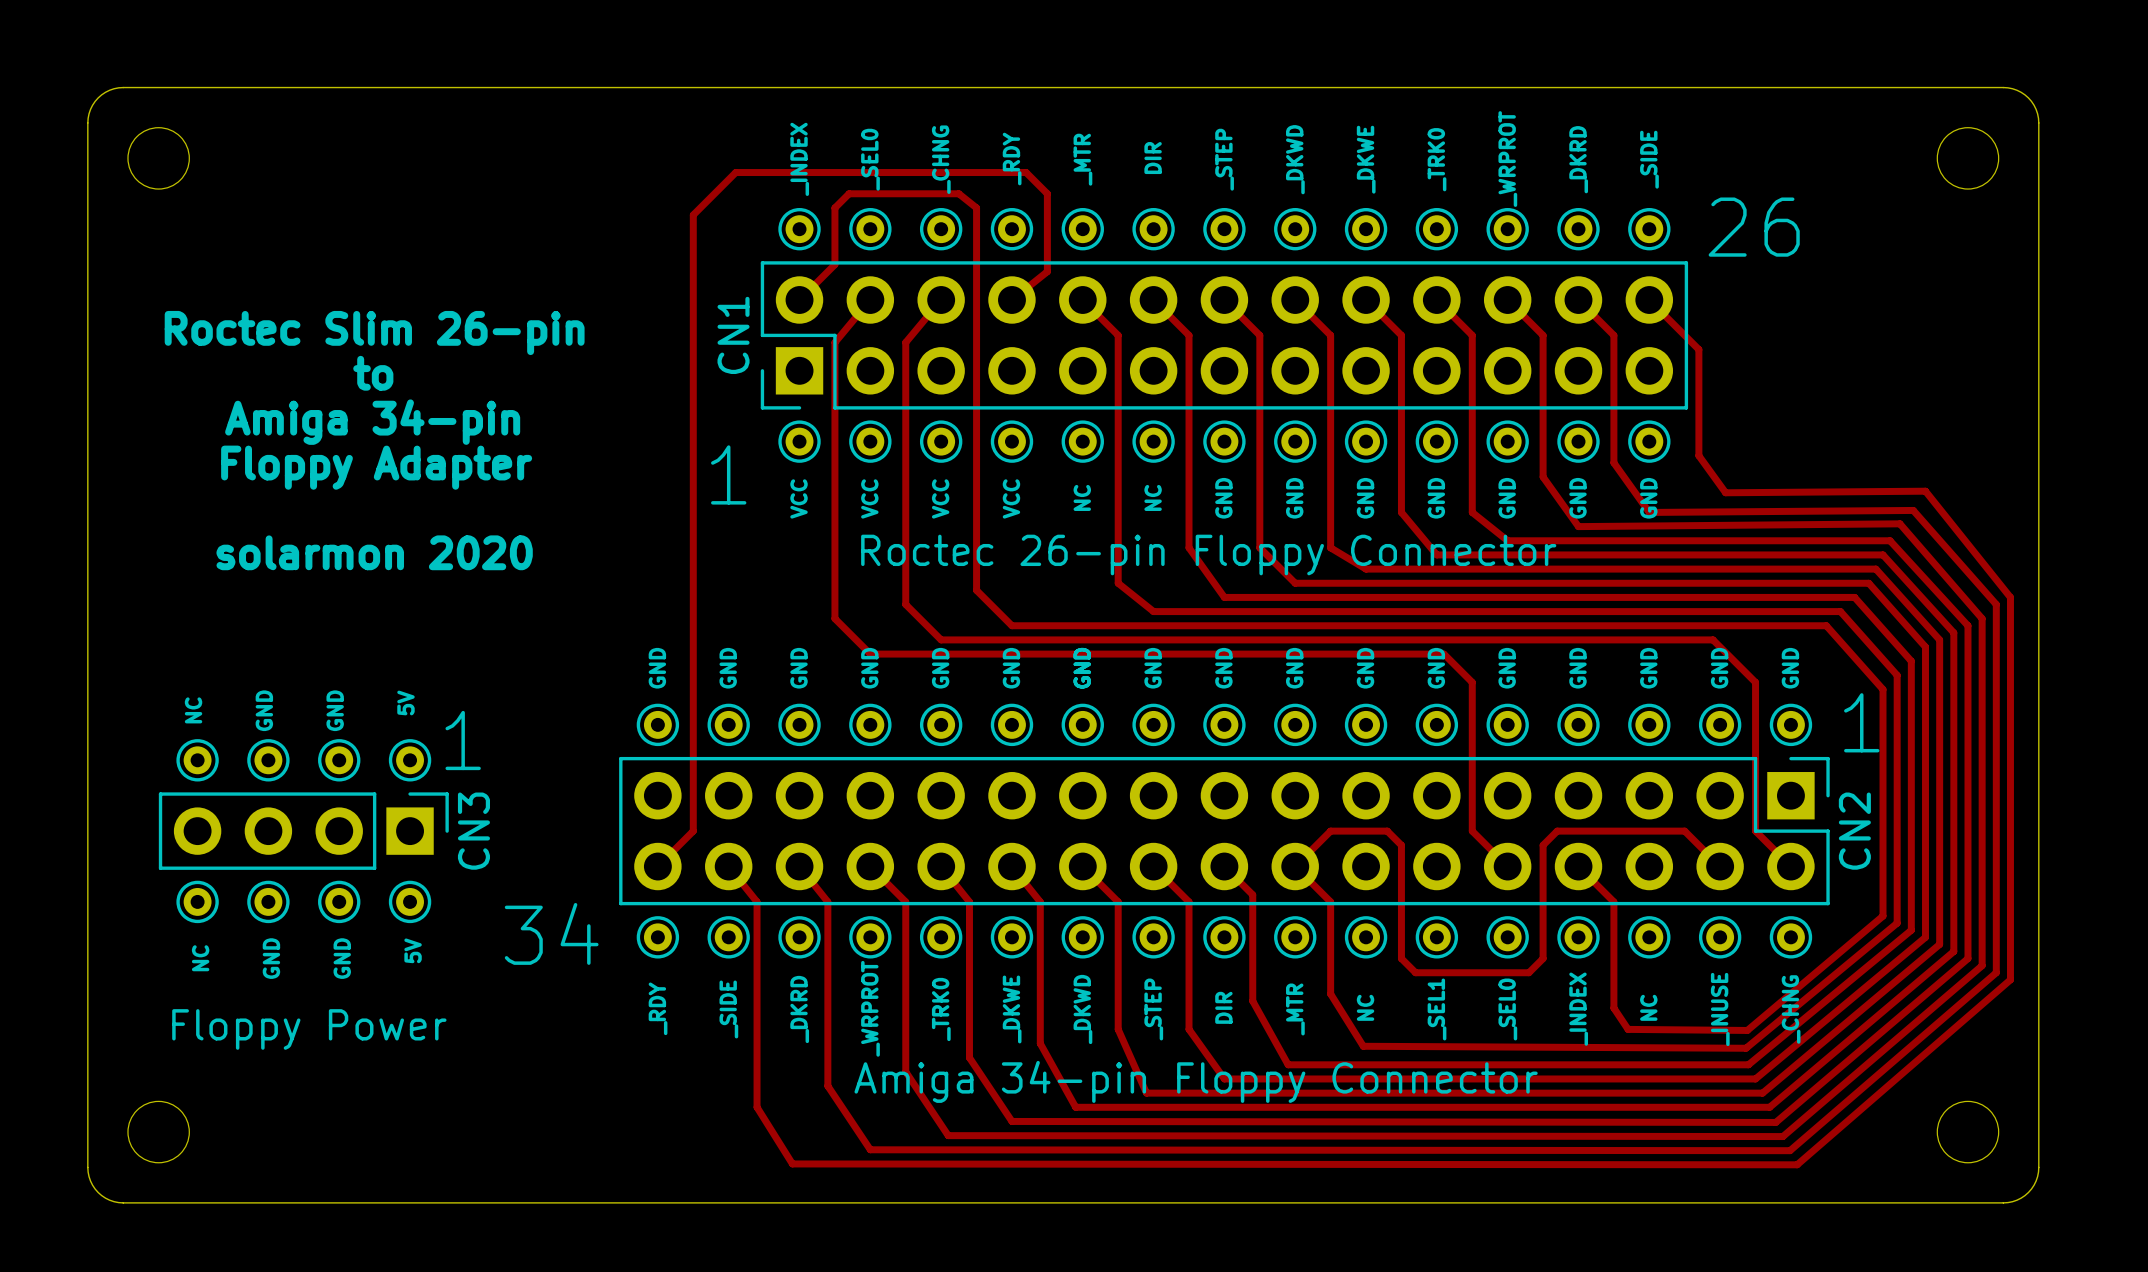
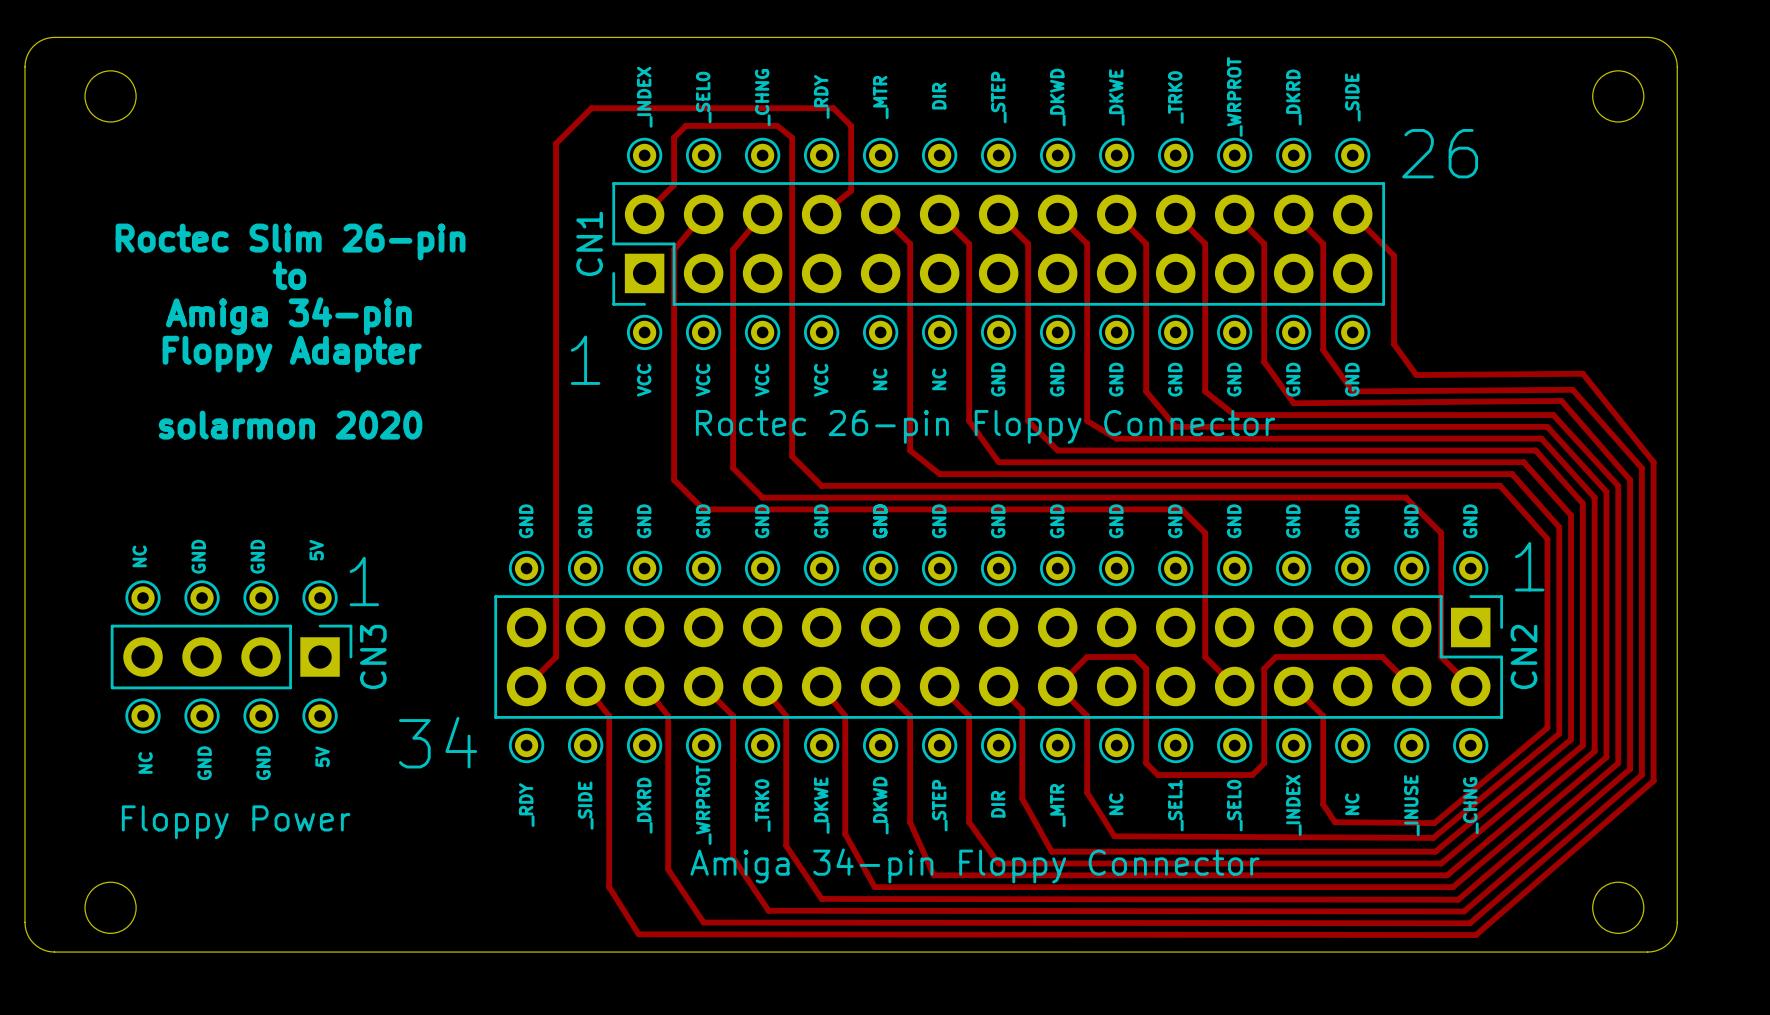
board edge: (123, 87) (109, 90) (98, 97) (90, 109) (87, 122) (87, 1167) (92, 1185) (105, 1198) (123, 1202) (2003, 1202) (2021, 1198) (2034, 1185) (2038, 1172) (2038, 1149) -> (81, 37) (50, 37) (39, 41) (28, 52) (25, 66) (25, 922) (28, 937) (39, 948) (54, 952) (1647, 952) (1659, 949) (1668, 943) (1675, 933) (1677, 922)

